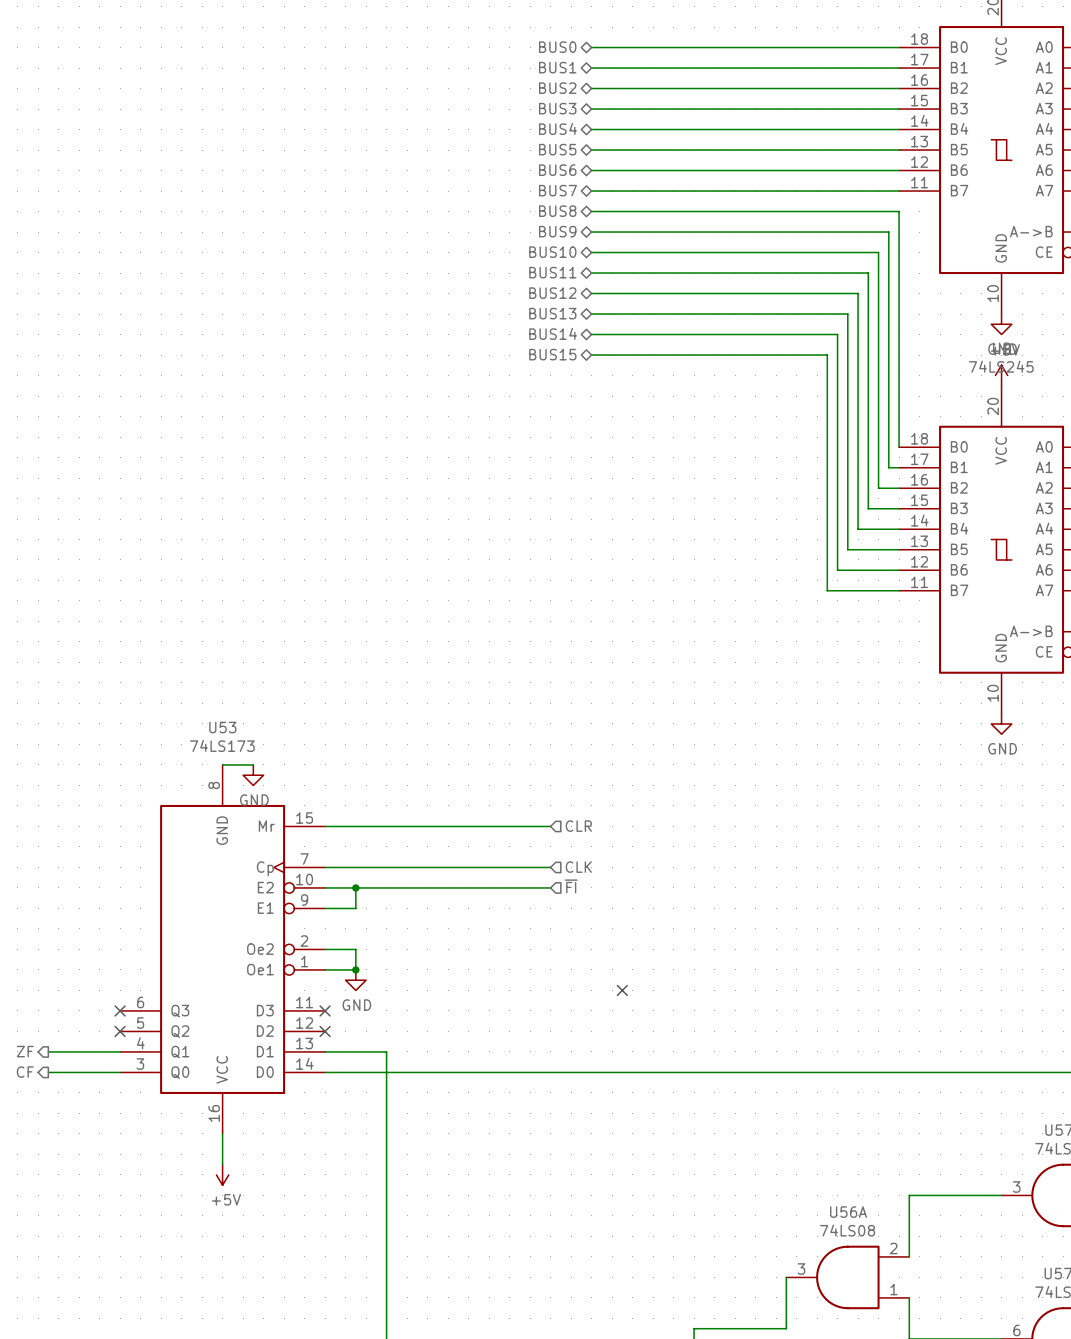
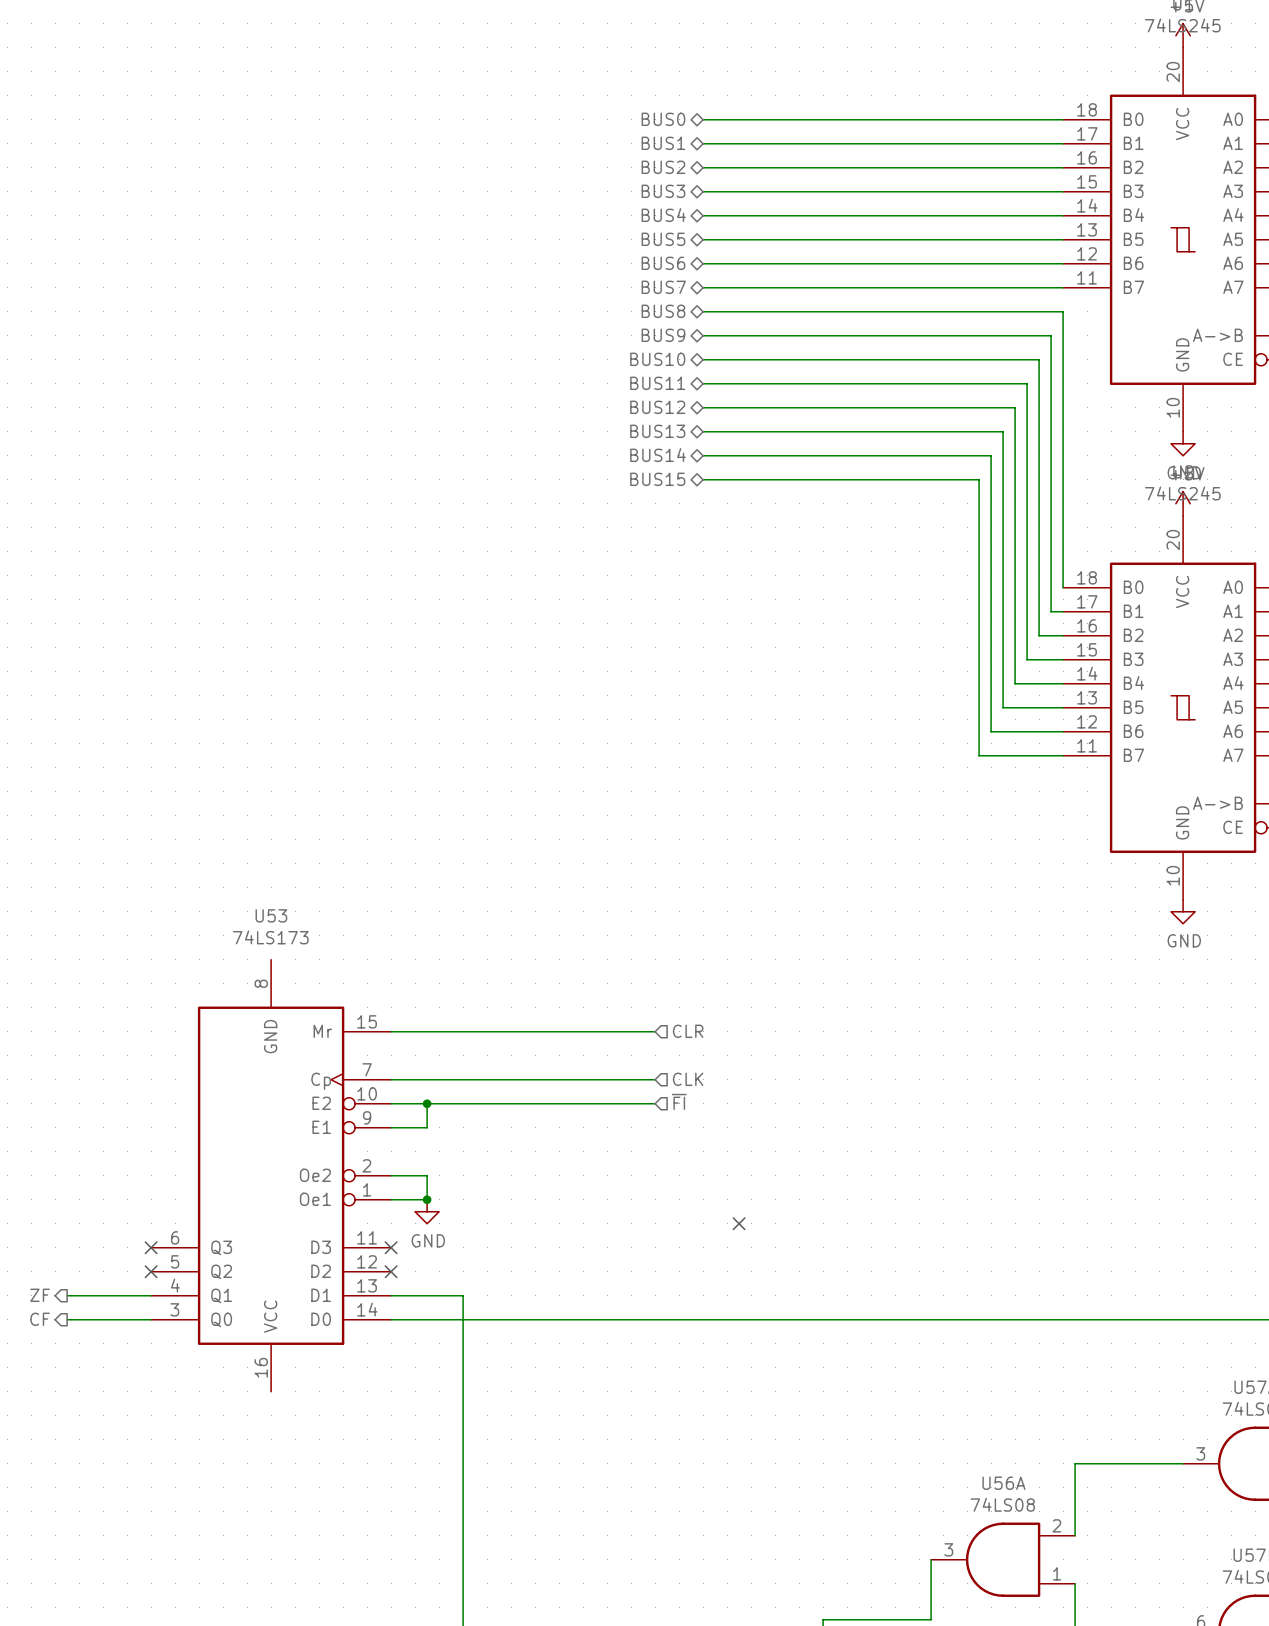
wire: (222, 764) (253, 764) -> none
power symbol: GND (253, 775) -> none
wire: (222, 1133) (222, 1164) -> none
power symbol: +5V (222, 1174) -> none

